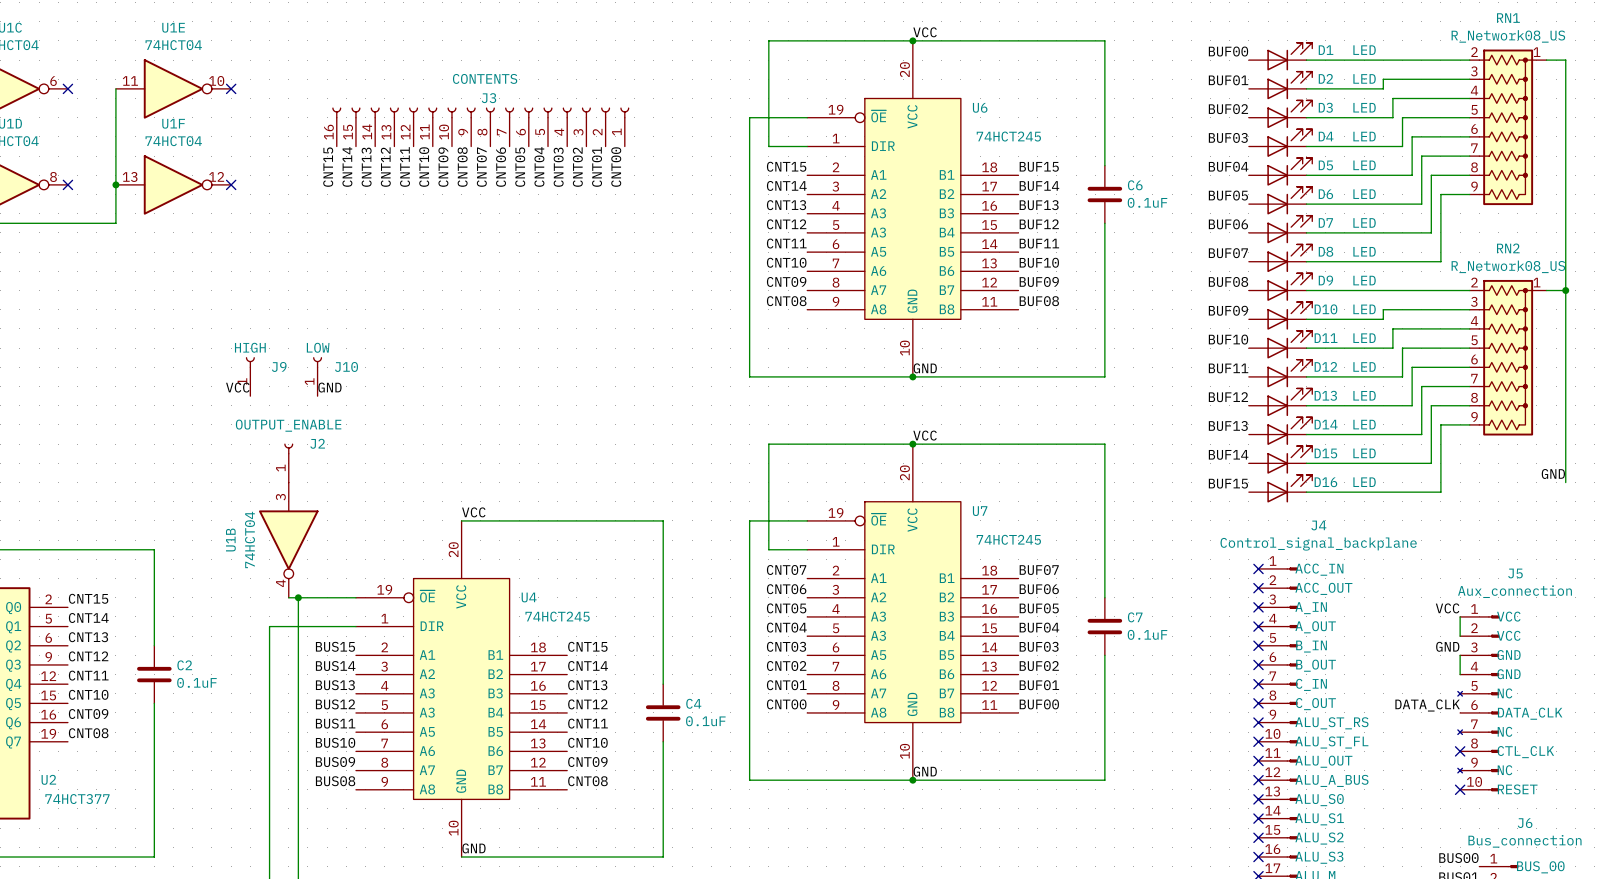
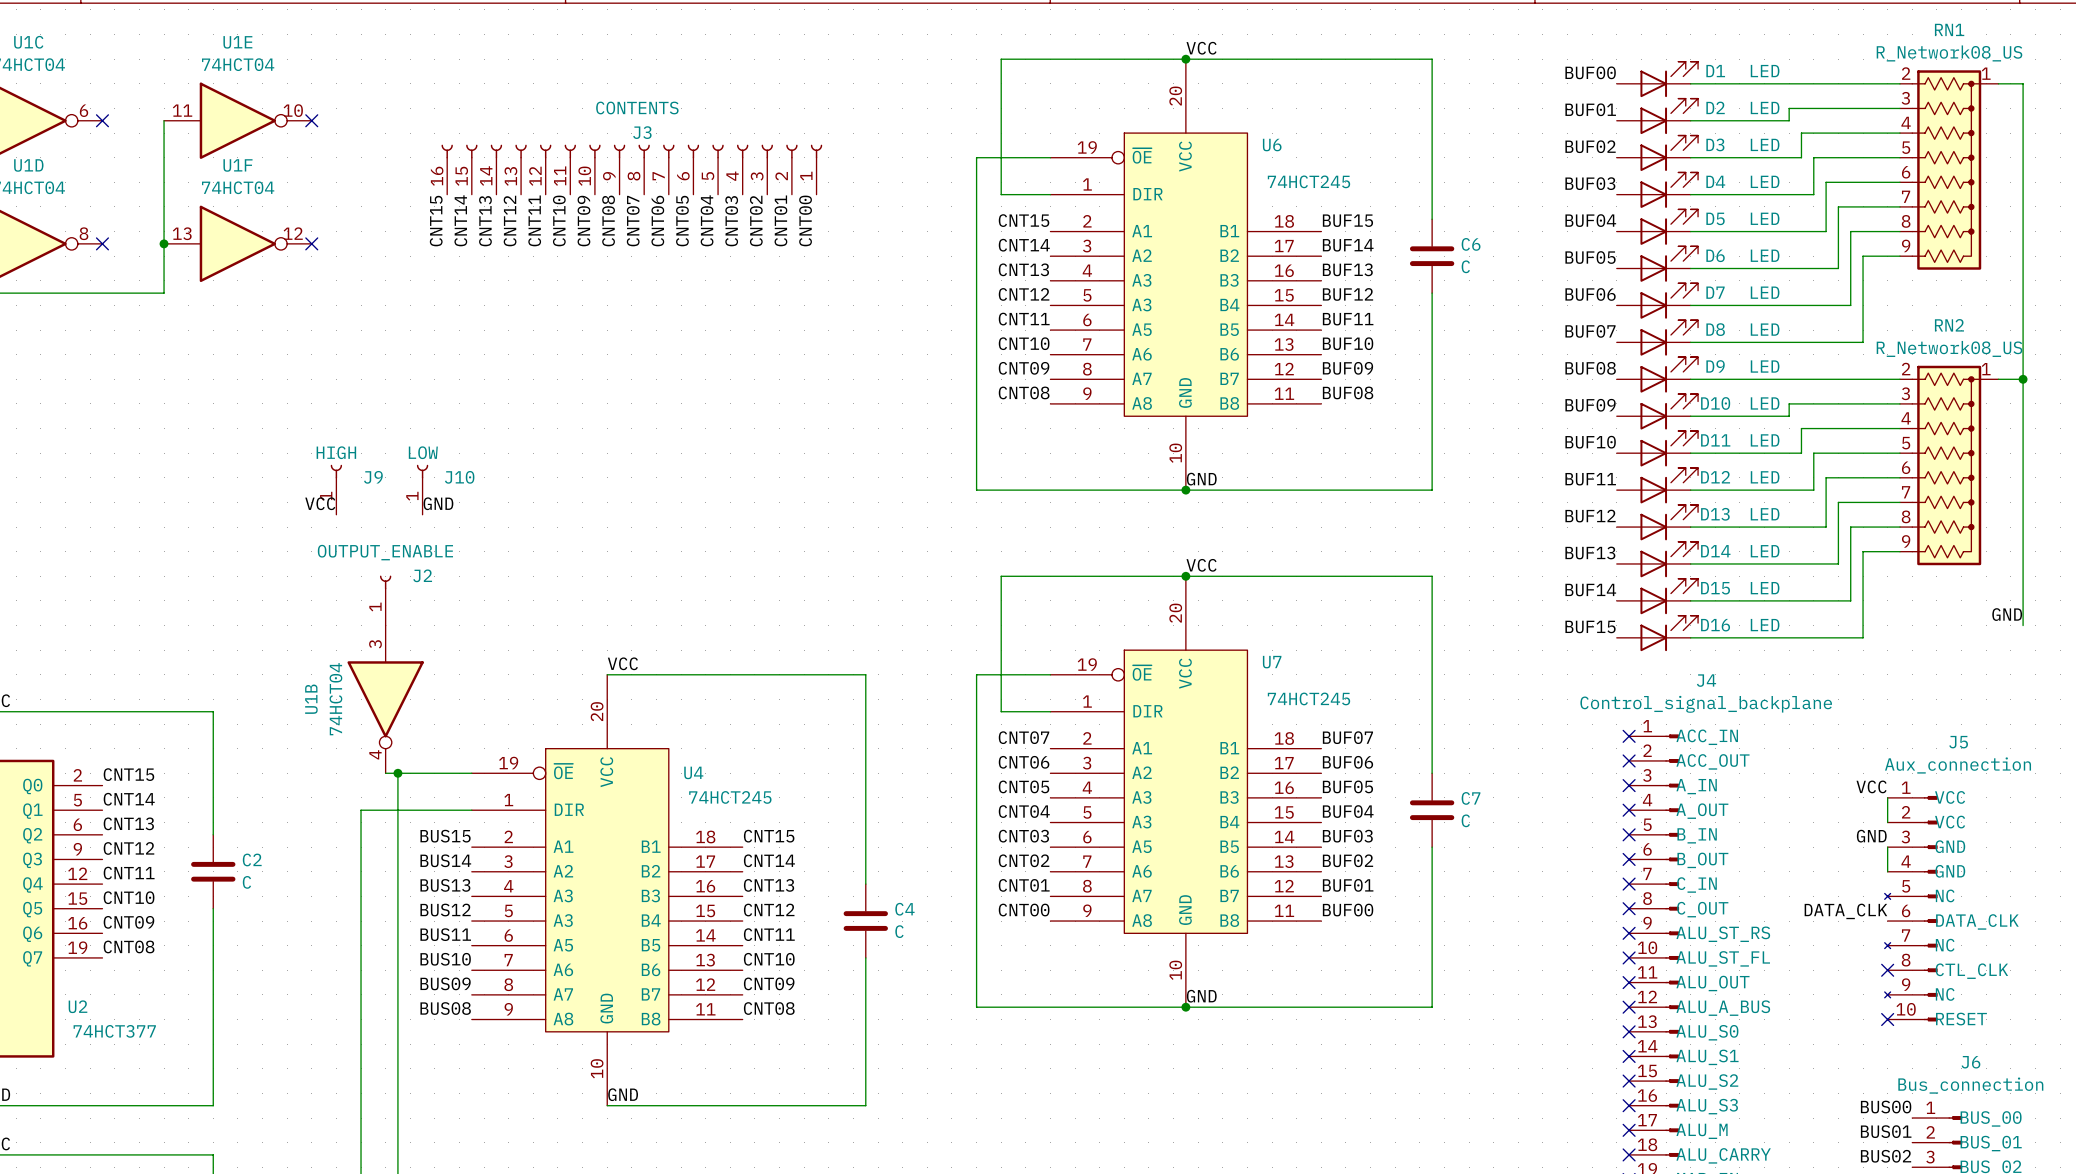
C6 value: 0.1uF (1147, 202) -> C (1465, 266)
C7 value: 0.1uF (1147, 634) -> C (1465, 820)
C2 value: 0.1uF (196, 682) -> C (246, 882)
C4 value: 0.1uF (705, 721) -> C (899, 931)

